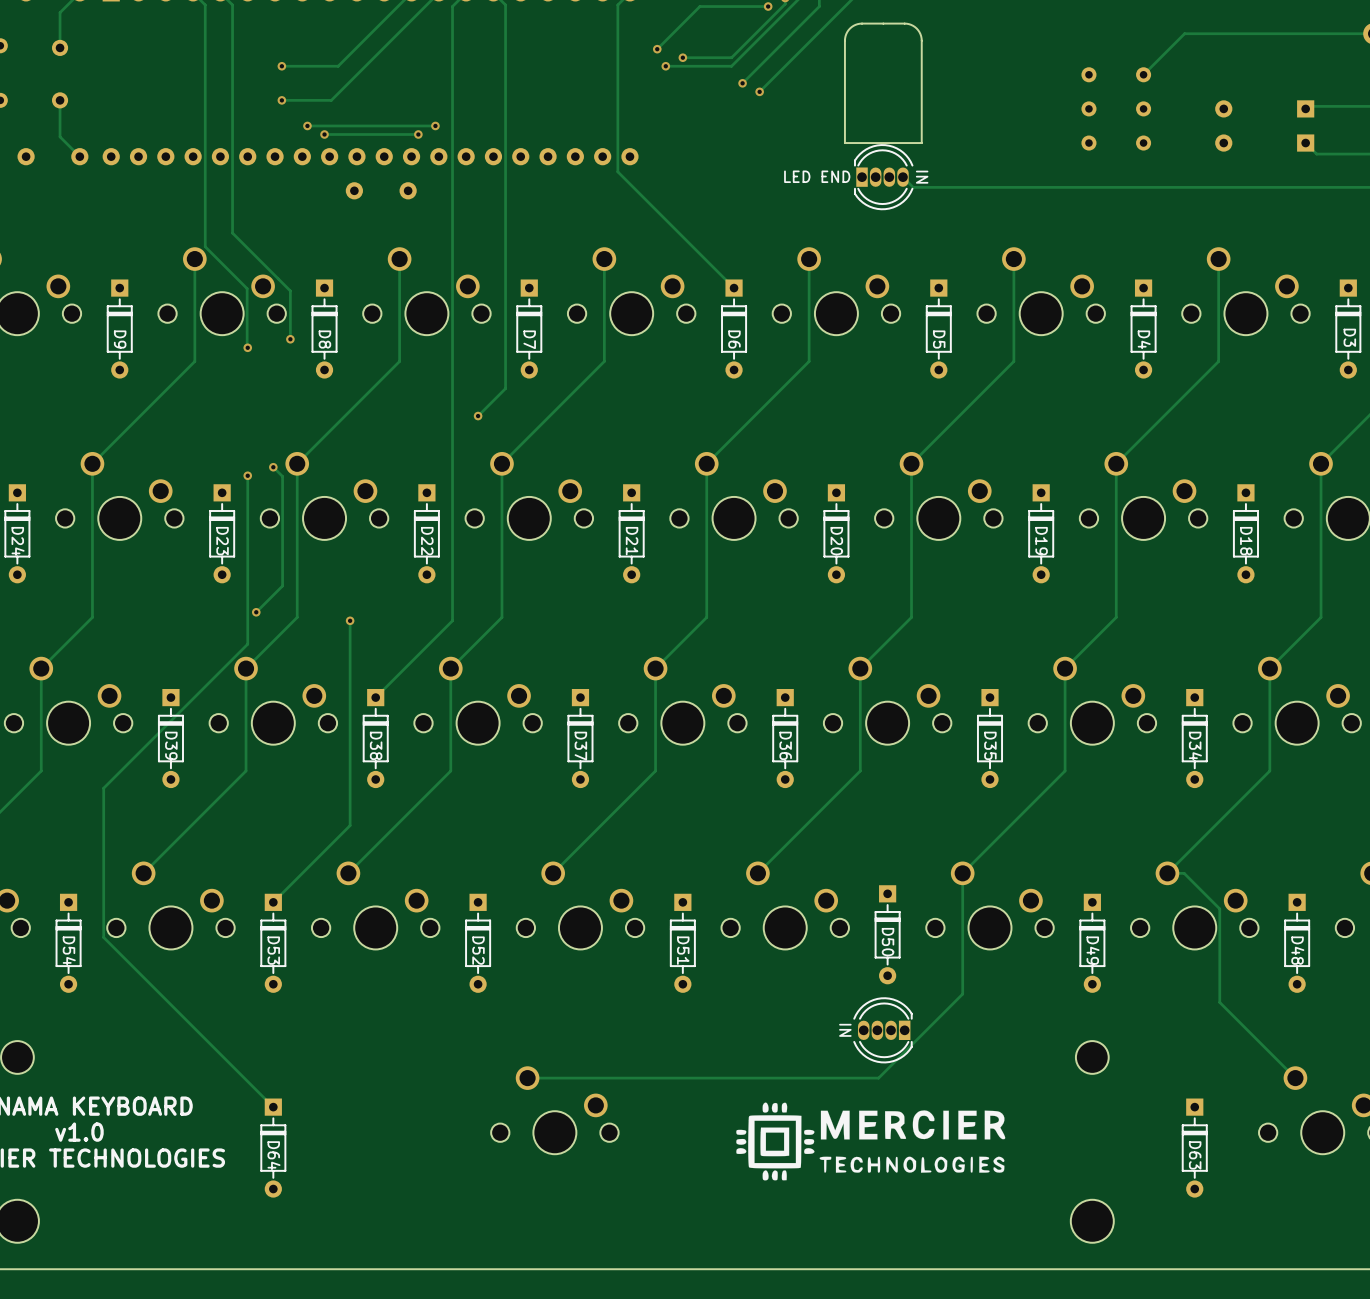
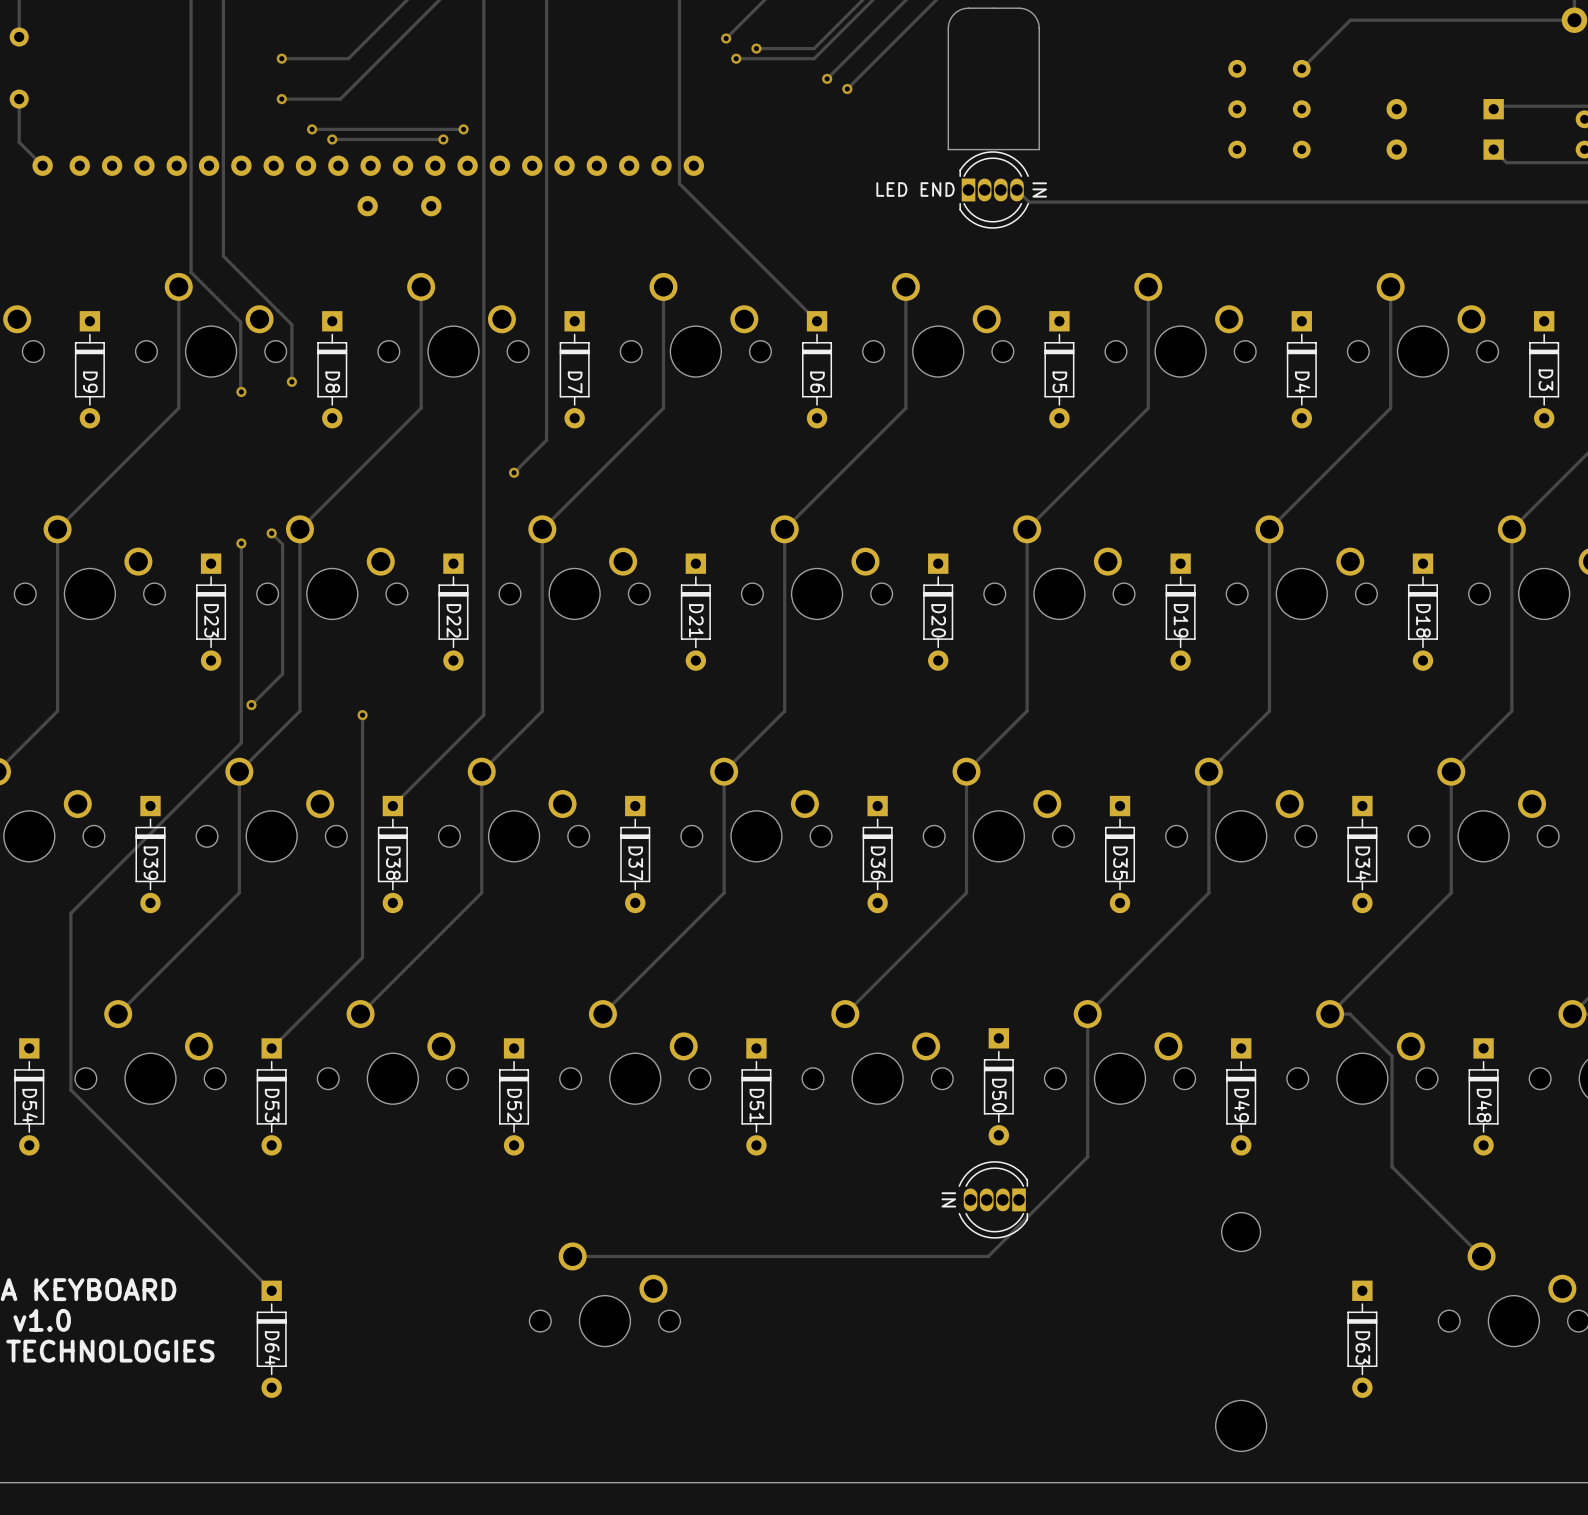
drawing: [736, 1102, 1006, 1181] -> none

